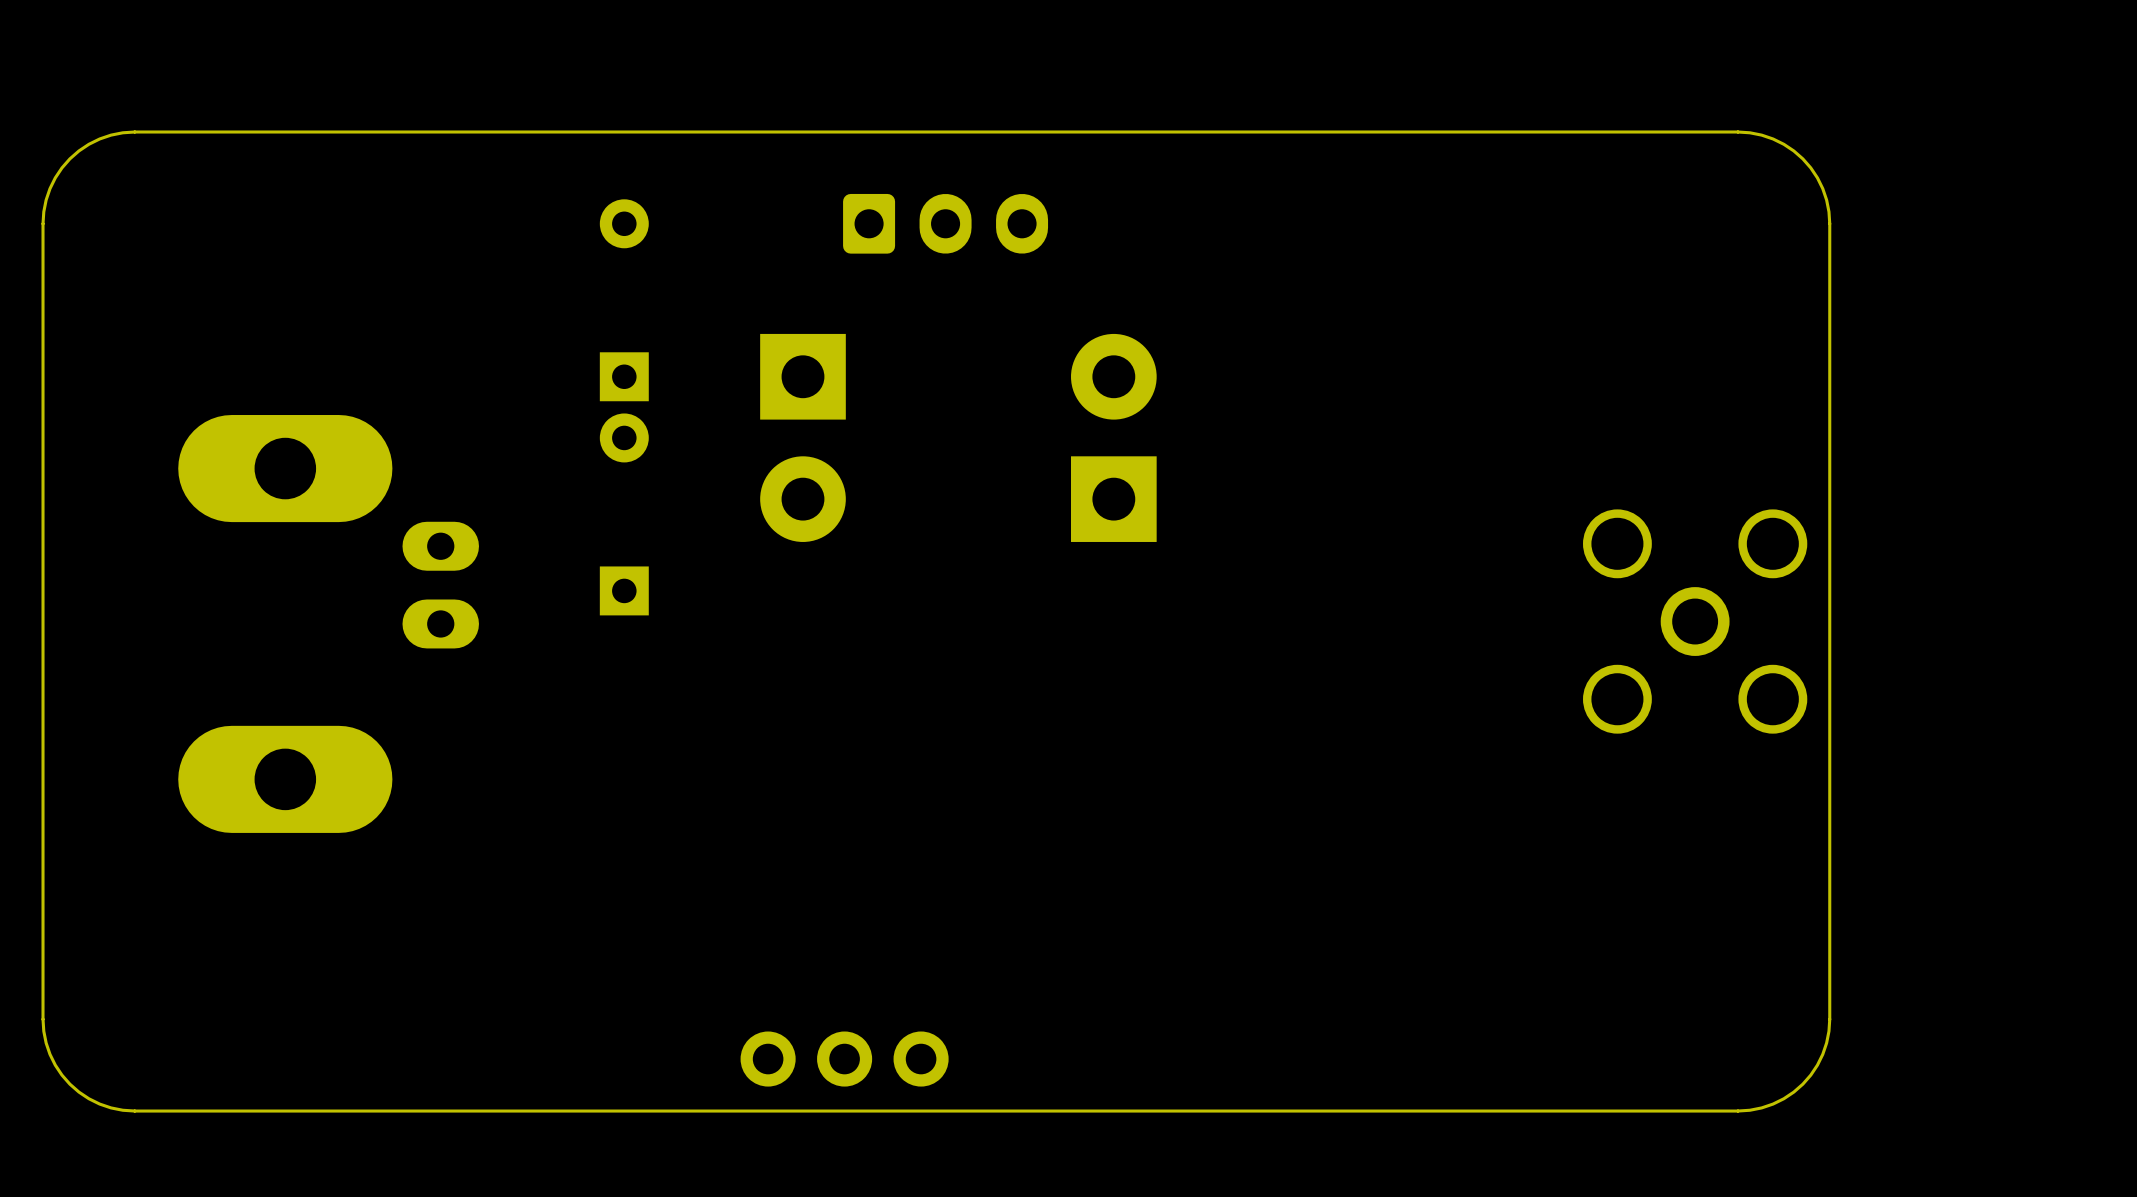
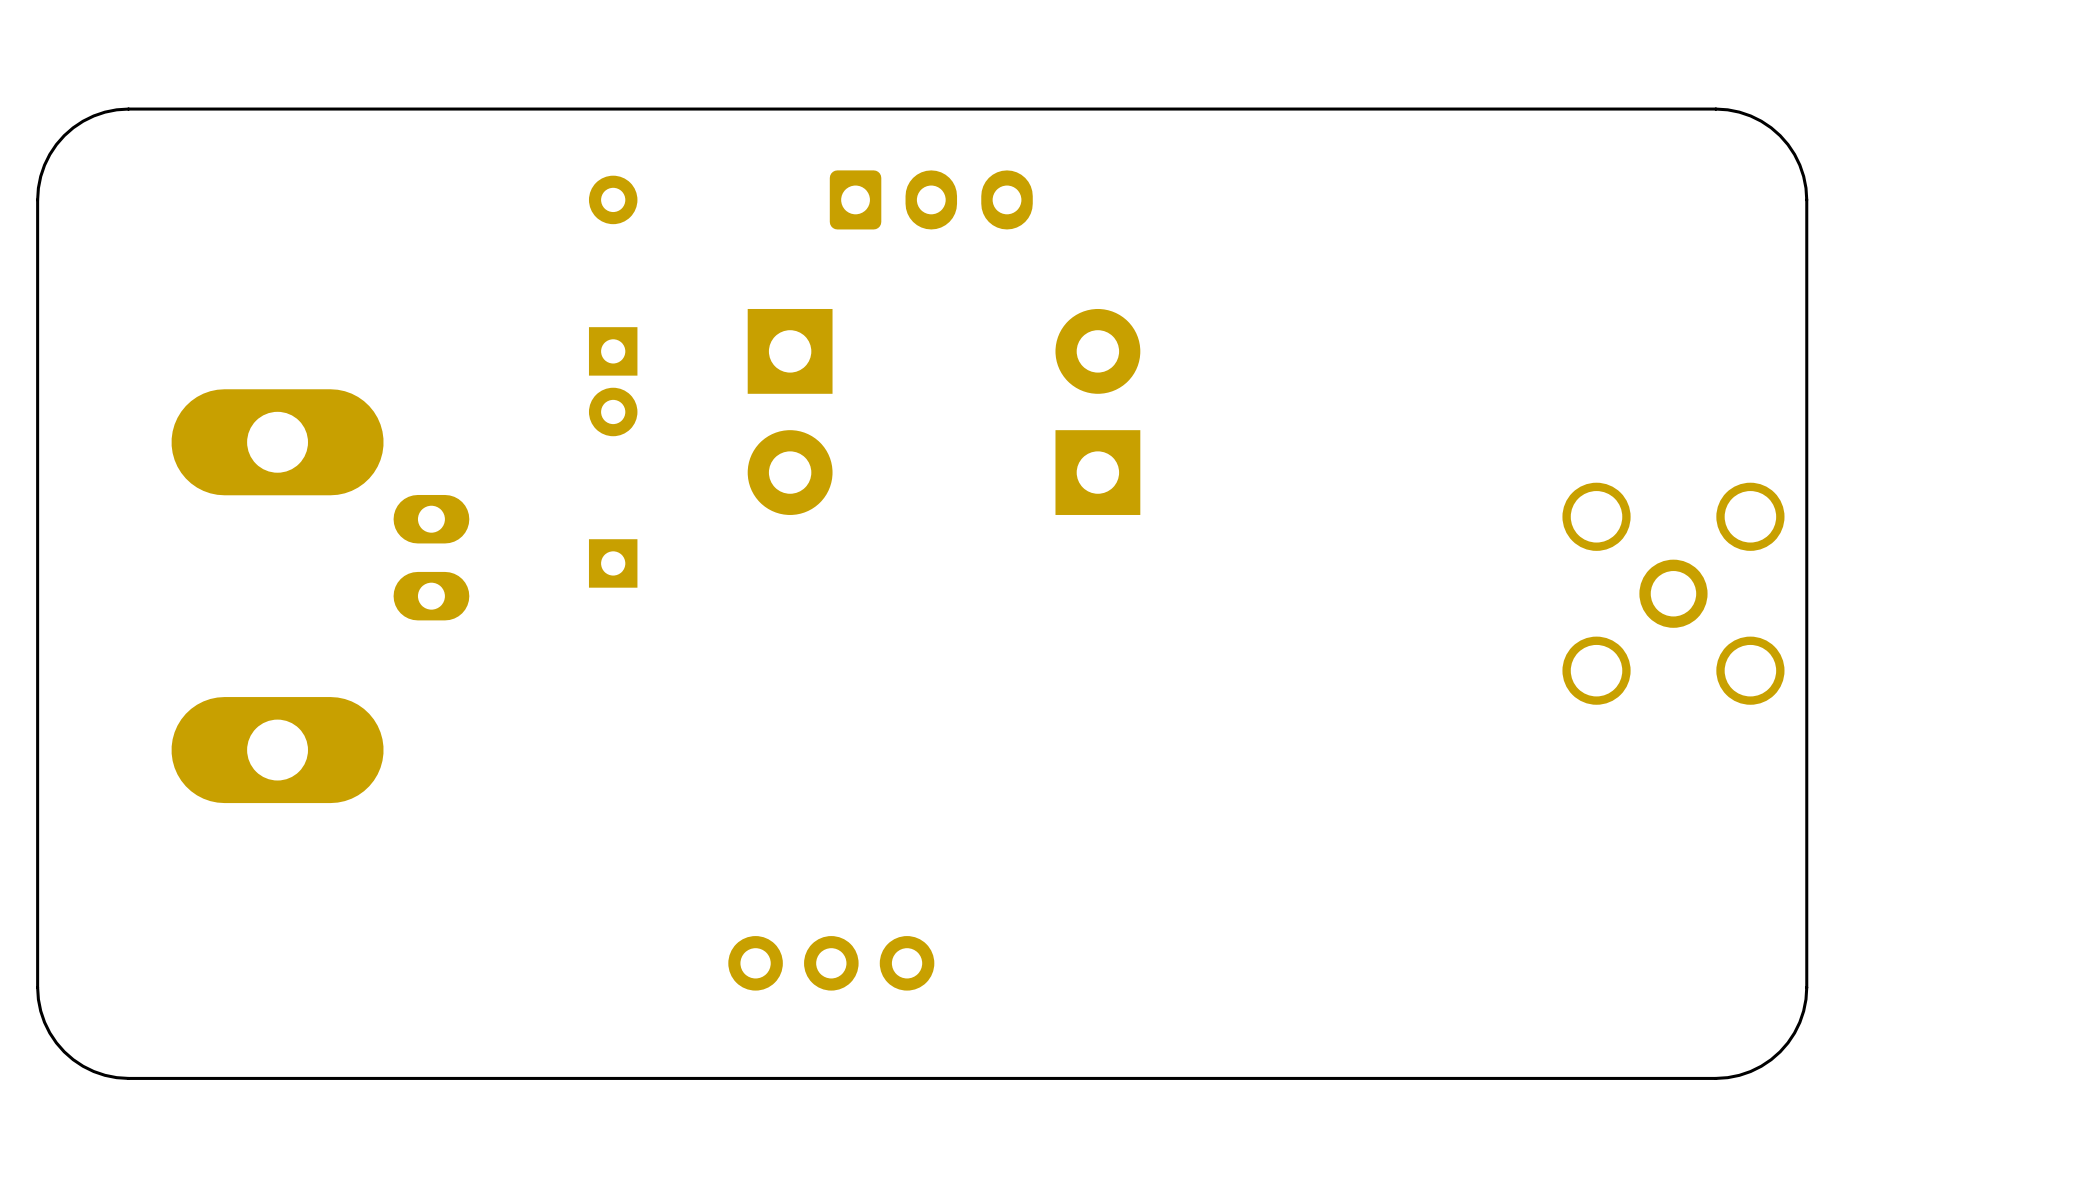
part position: (844, 1059) -> (831, 963)

